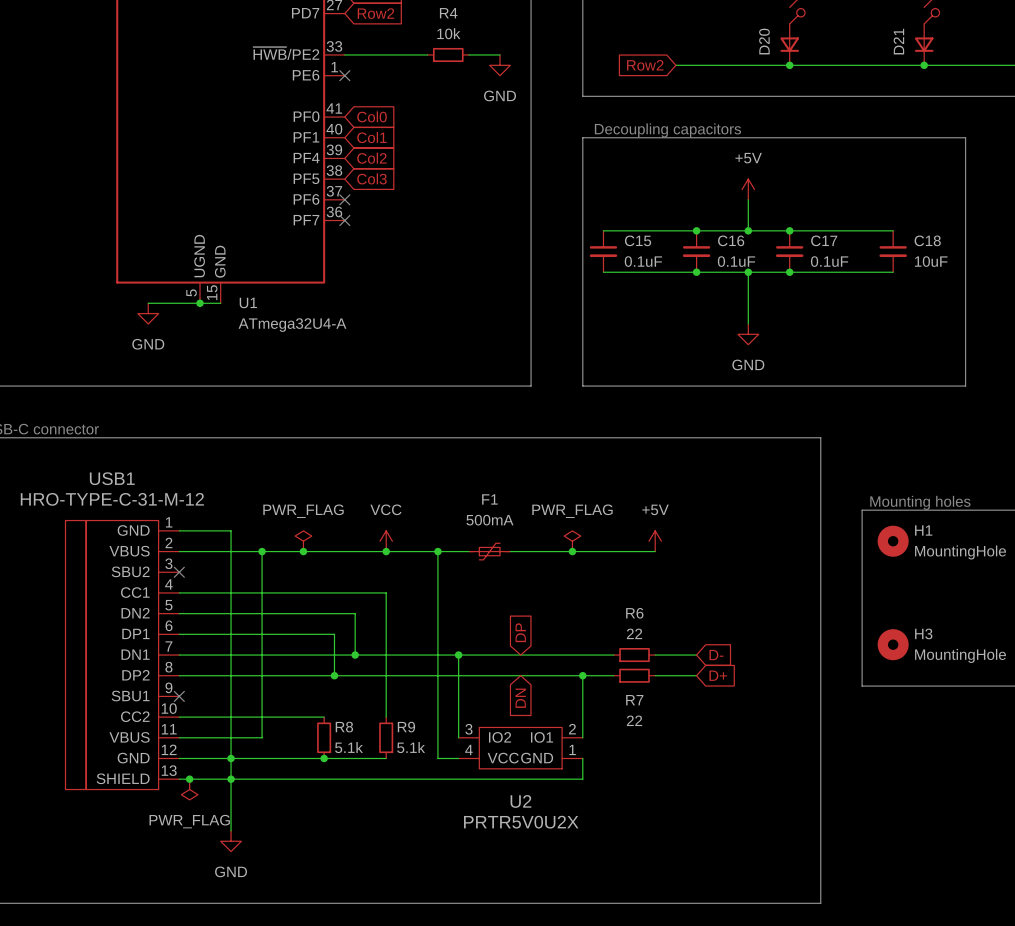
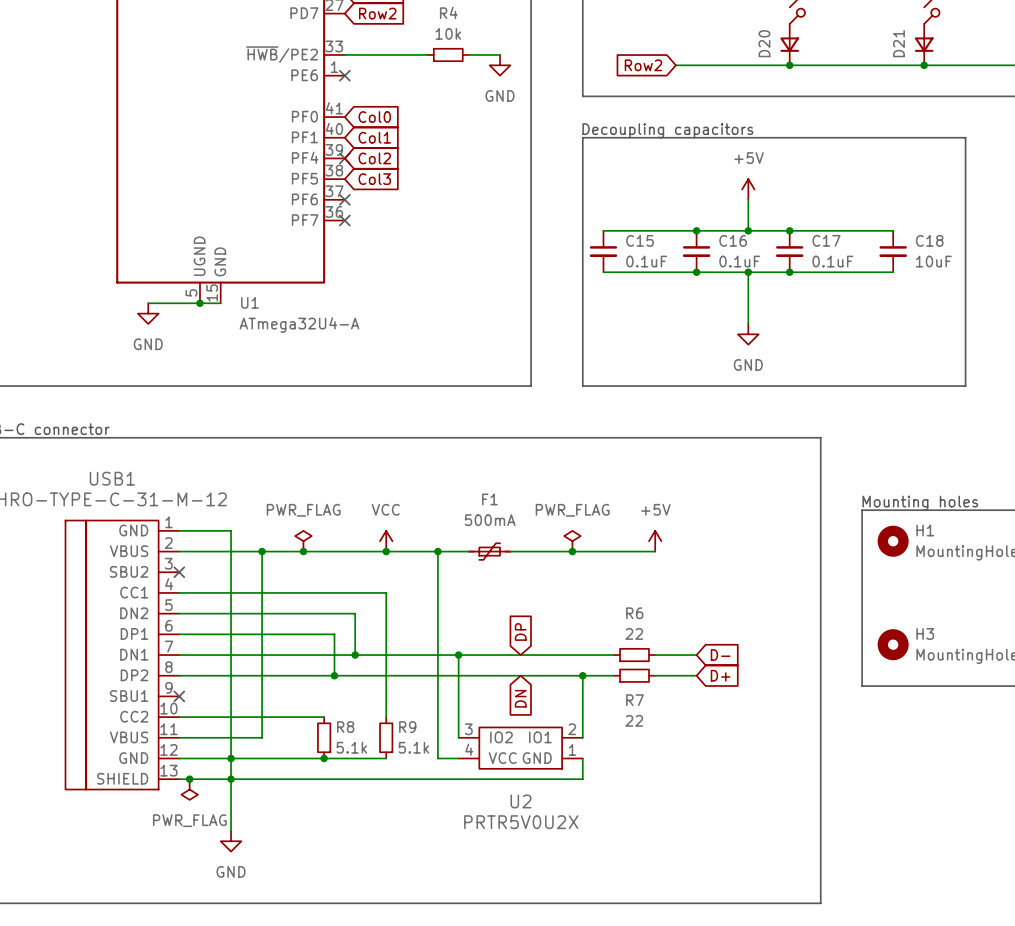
no-connect mark: none -> (344, 158)

